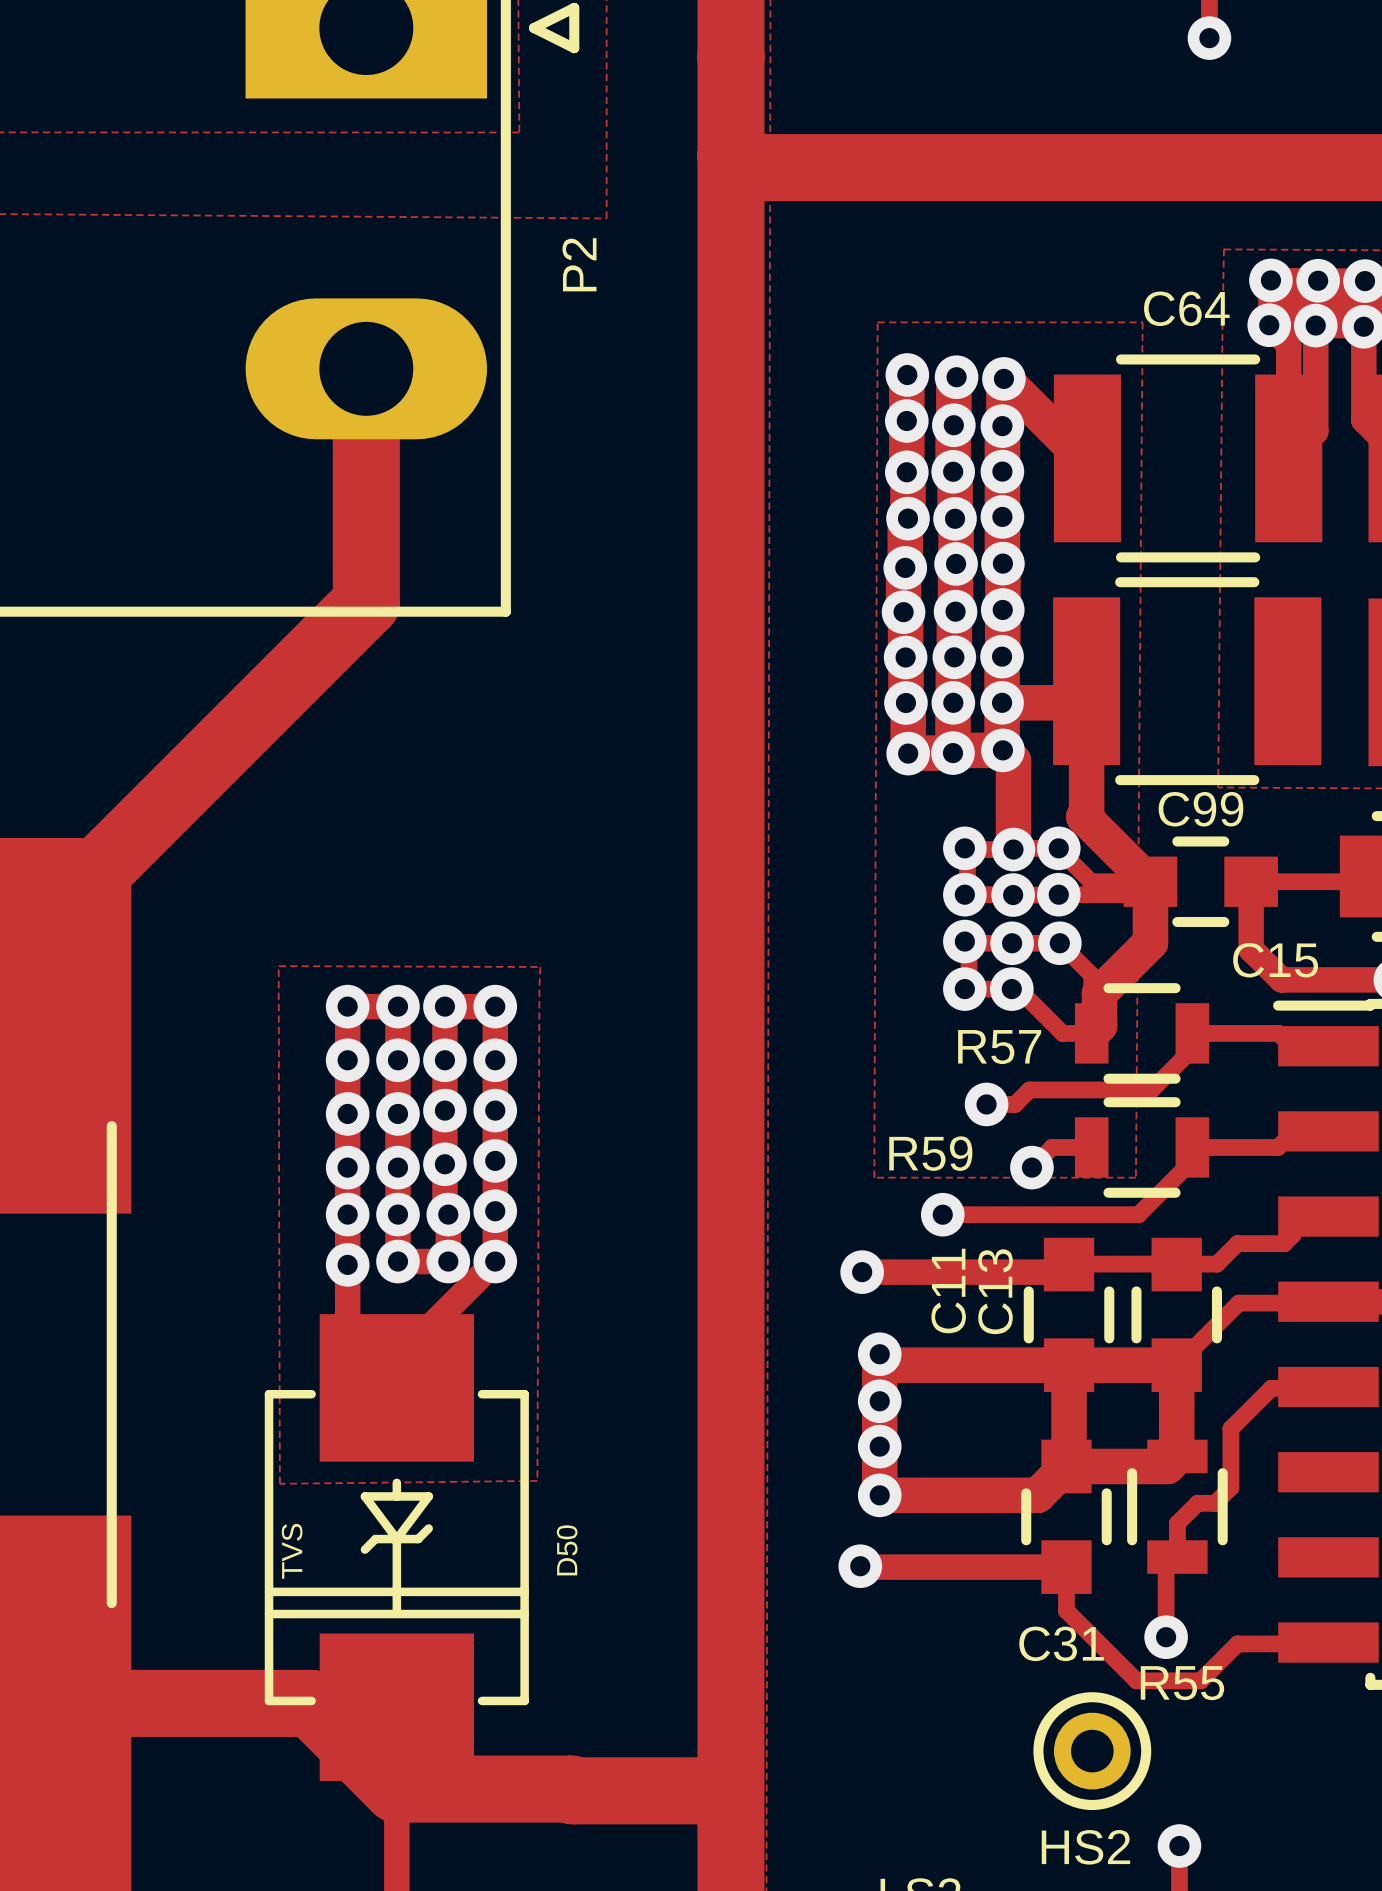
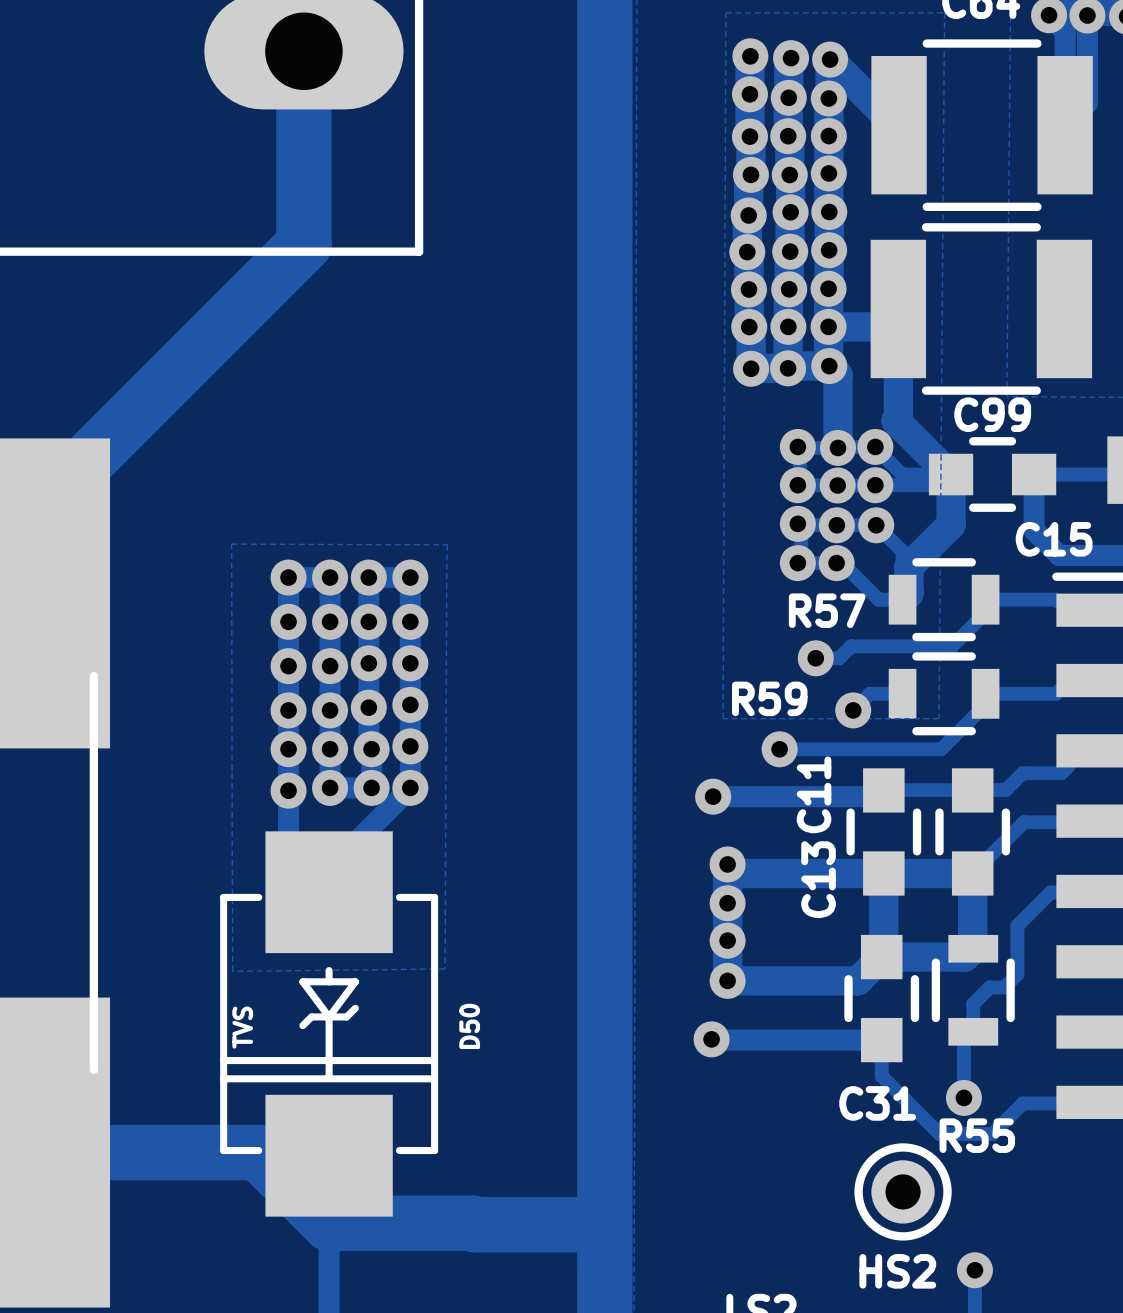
C11 name position: C11 (948, 1290) -> C11 (814, 794)
C13 name position: C13 (995, 1291) -> C13 (818, 879)

